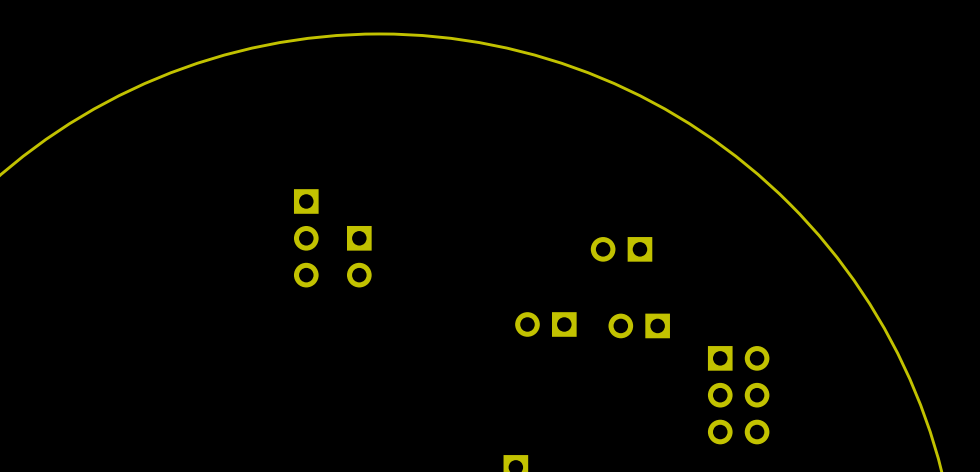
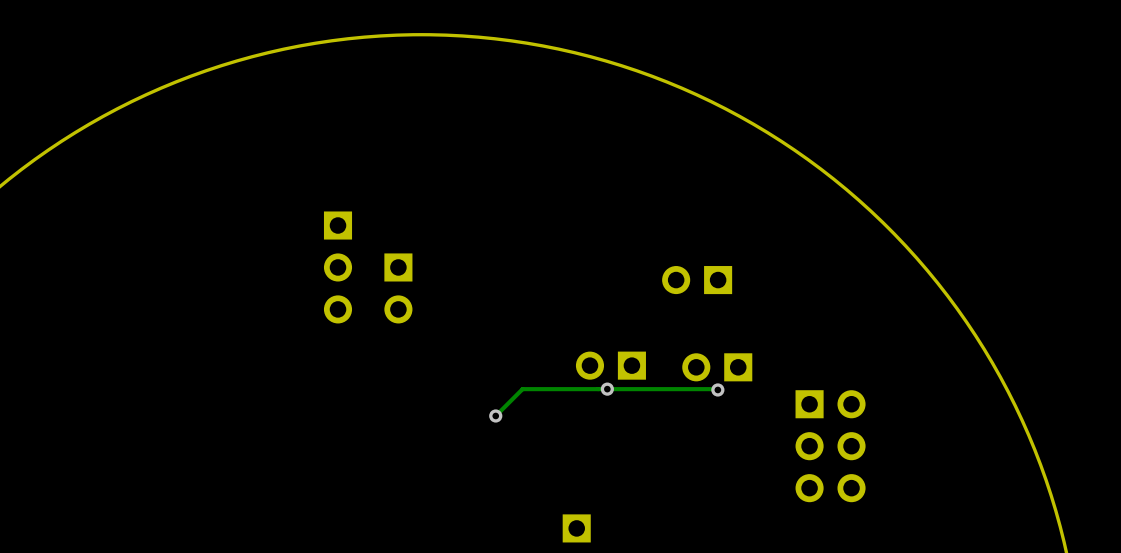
via: none -> (607, 389)
track: none -> (717, 389) (522, 389) (495, 415)
via: none -> (717, 389)
via: none -> (495, 415)

